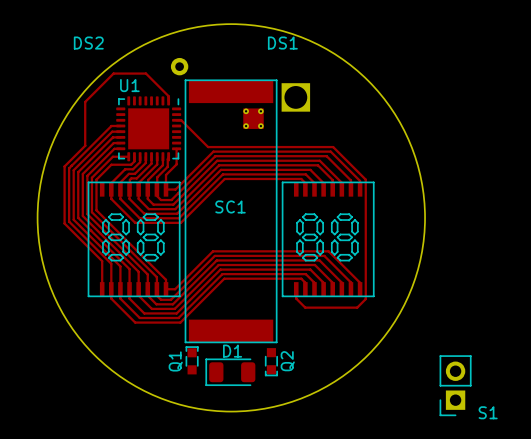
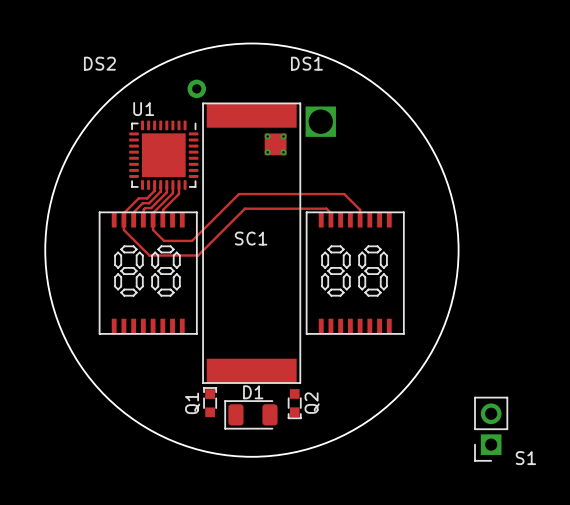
track: (168, 100) (168, 96) (145, 73) (113, 73) (85, 101) (85, 145) (64, 166) (64, 223) (102, 261) (102, 289) -> none
track: (176, 120) (181, 120) (208, 147) (333, 147) (365, 179) (365, 299) (357, 307) (305, 307) (296, 298) (296, 289) -> none
track: (120, 125) (111, 125) (69, 168) (69, 221) (111, 263) (111, 298) (135, 322) (180, 322) (224, 278) (301, 278) (305, 282) (305, 289) -> none
track: (120, 131) (112, 131) (73, 170) (73, 219) (120, 266) (120, 298) (139, 318) (178, 318) (222, 274) (305, 274) (314, 282) (314, 289) -> none
track: (120, 137) (112, 137) (78, 172) (78, 217) (129, 269) (129, 298) (144, 313) (176, 313) (220, 269) (310, 269) (323, 282) (323, 289) -> none
track: (120, 143) (113, 143) (82, 174) (82, 215) (138, 271) (138, 295) (151, 308) (174, 308) (218, 265) (314, 265) (332, 282) (332, 289) -> none
track: (120, 148) (114, 148) (87, 175) (87, 214) (147, 274) (147, 295) (156, 304) (172, 304) (216, 260) (319, 260) (341, 282) (341, 289) -> none
track: (176, 148) (176, 164) (166, 175) (166, 189) (175, 189) (213, 151) (330, 151) (360, 180) (360, 189) -> none
track: (128, 156) (112, 156) (91, 177) (91, 212) (156, 277) (156, 295) (160, 299) (171, 299) (214, 255) (324, 255) (350, 282) (350, 289) -> none
track: (134, 156) (134, 161) (131, 164) (111, 164) (96, 179) (96, 210) (166, 279) (166, 289) (175, 289) (213, 251) (328, 251) (360, 282) (360, 289) -> none
track: (168, 156) (167, 166) (157, 177) (157, 189) -> none
track: (120, 189) (120, 198) (139, 218) (179, 218) (222, 174) (305, 174) (314, 183) (314, 189) -> none
track: (129, 189) (129, 198) (144, 213) (177, 213) (221, 169) (310, 169) (323, 183) (323, 189) -> none
track: (147, 189) (147, 198) (153, 204) (173, 204) (217, 160) (319, 160) (341, 182) (341, 189) -> none
track: (156, 189) (156, 195) (160, 200) (171, 200) (215, 156) (326, 156) (350, 180) (350, 189) -> none

